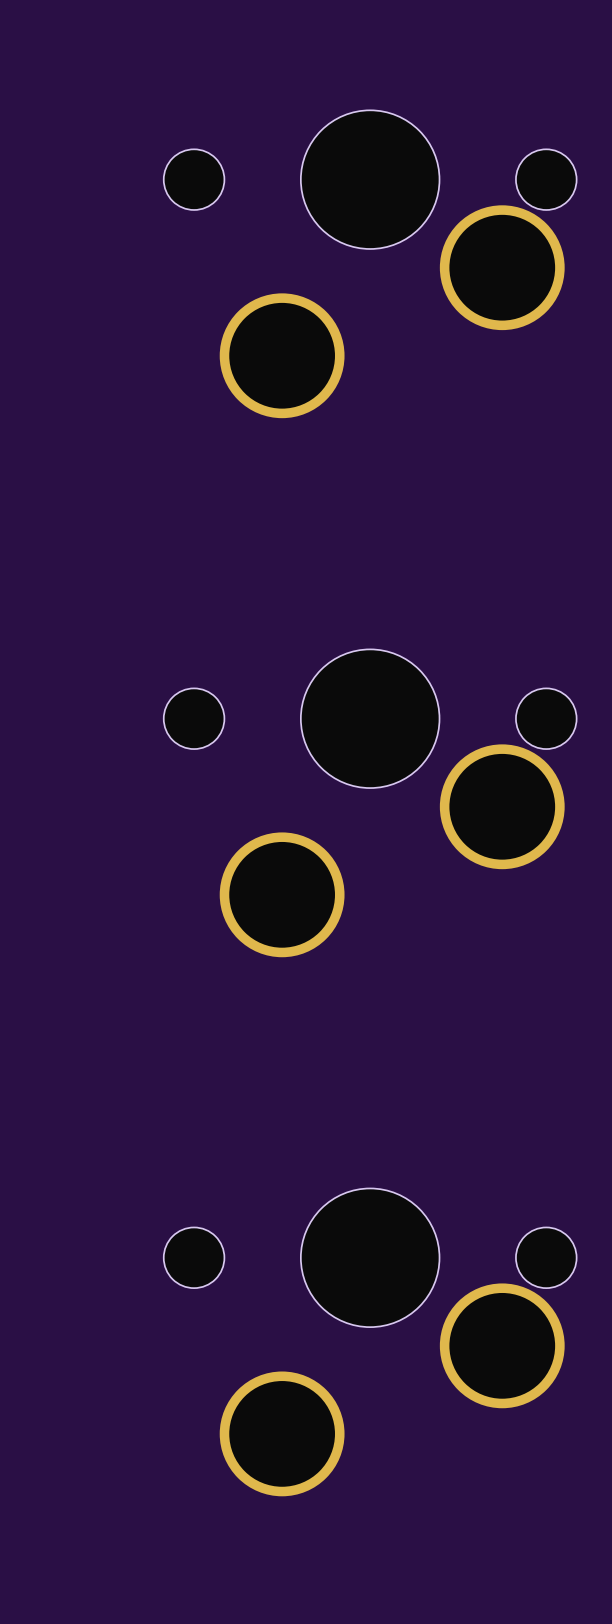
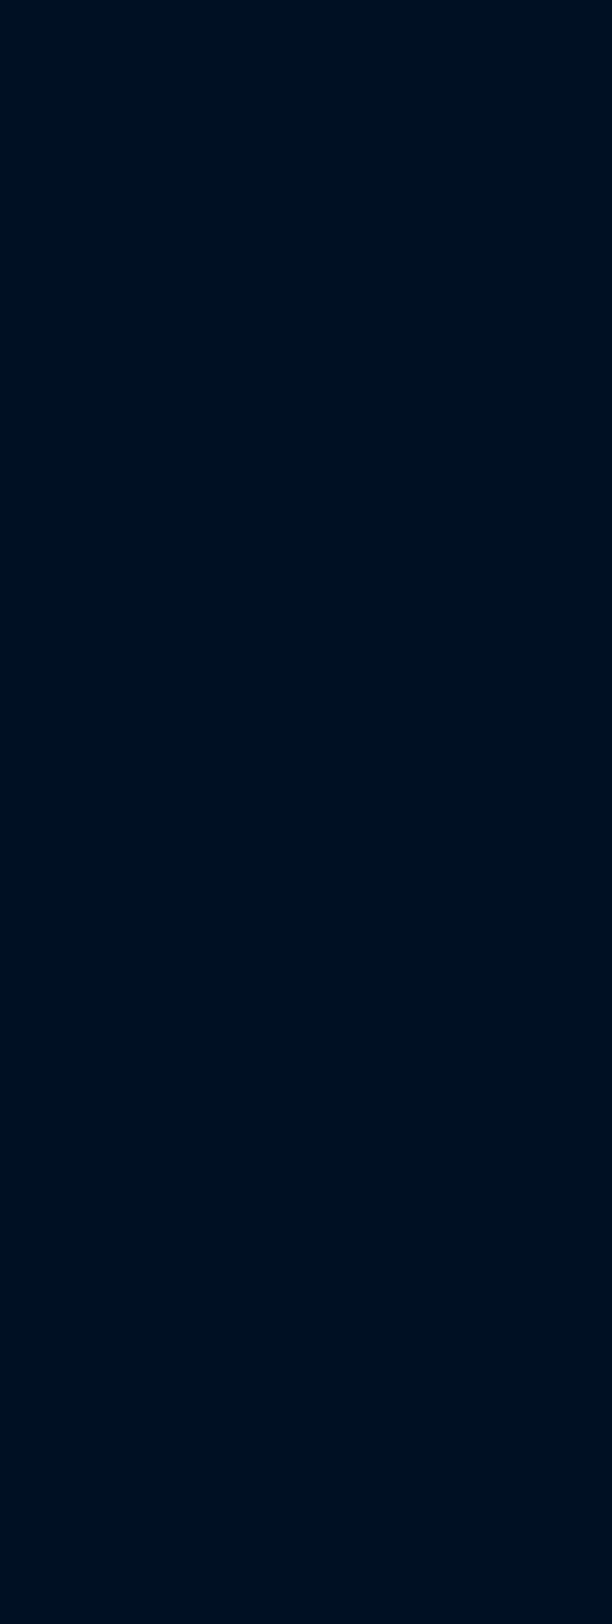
part: (370, 264) -> none
part: (370, 803) -> none
part: (370, 1342) -> none

